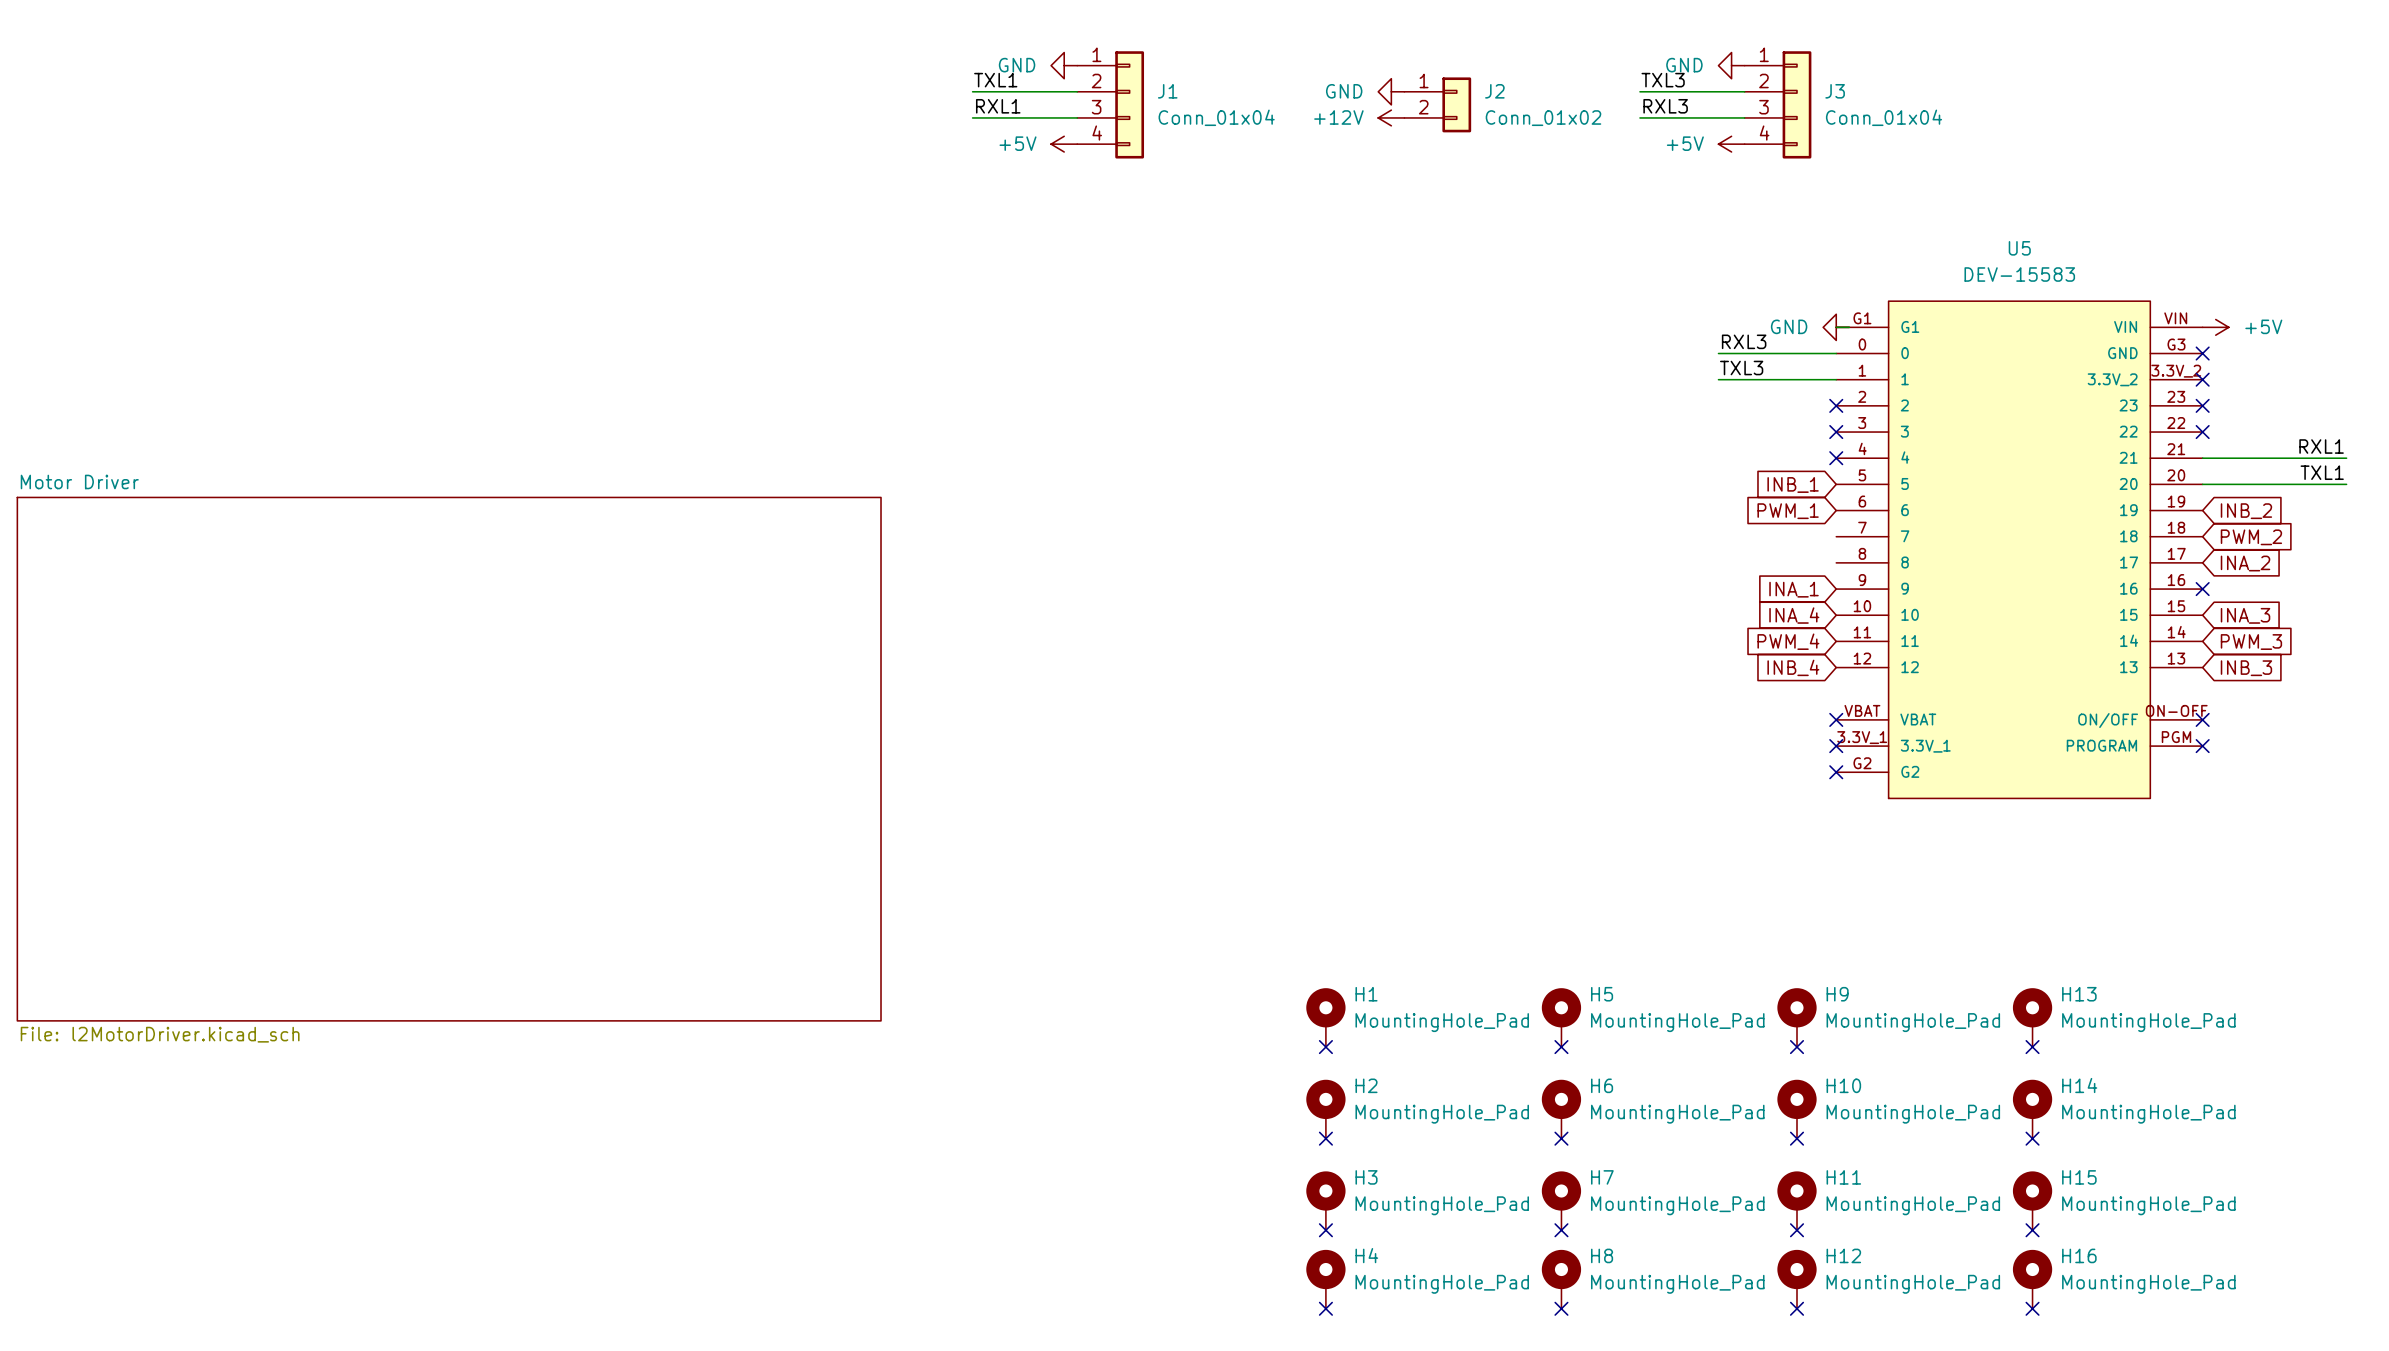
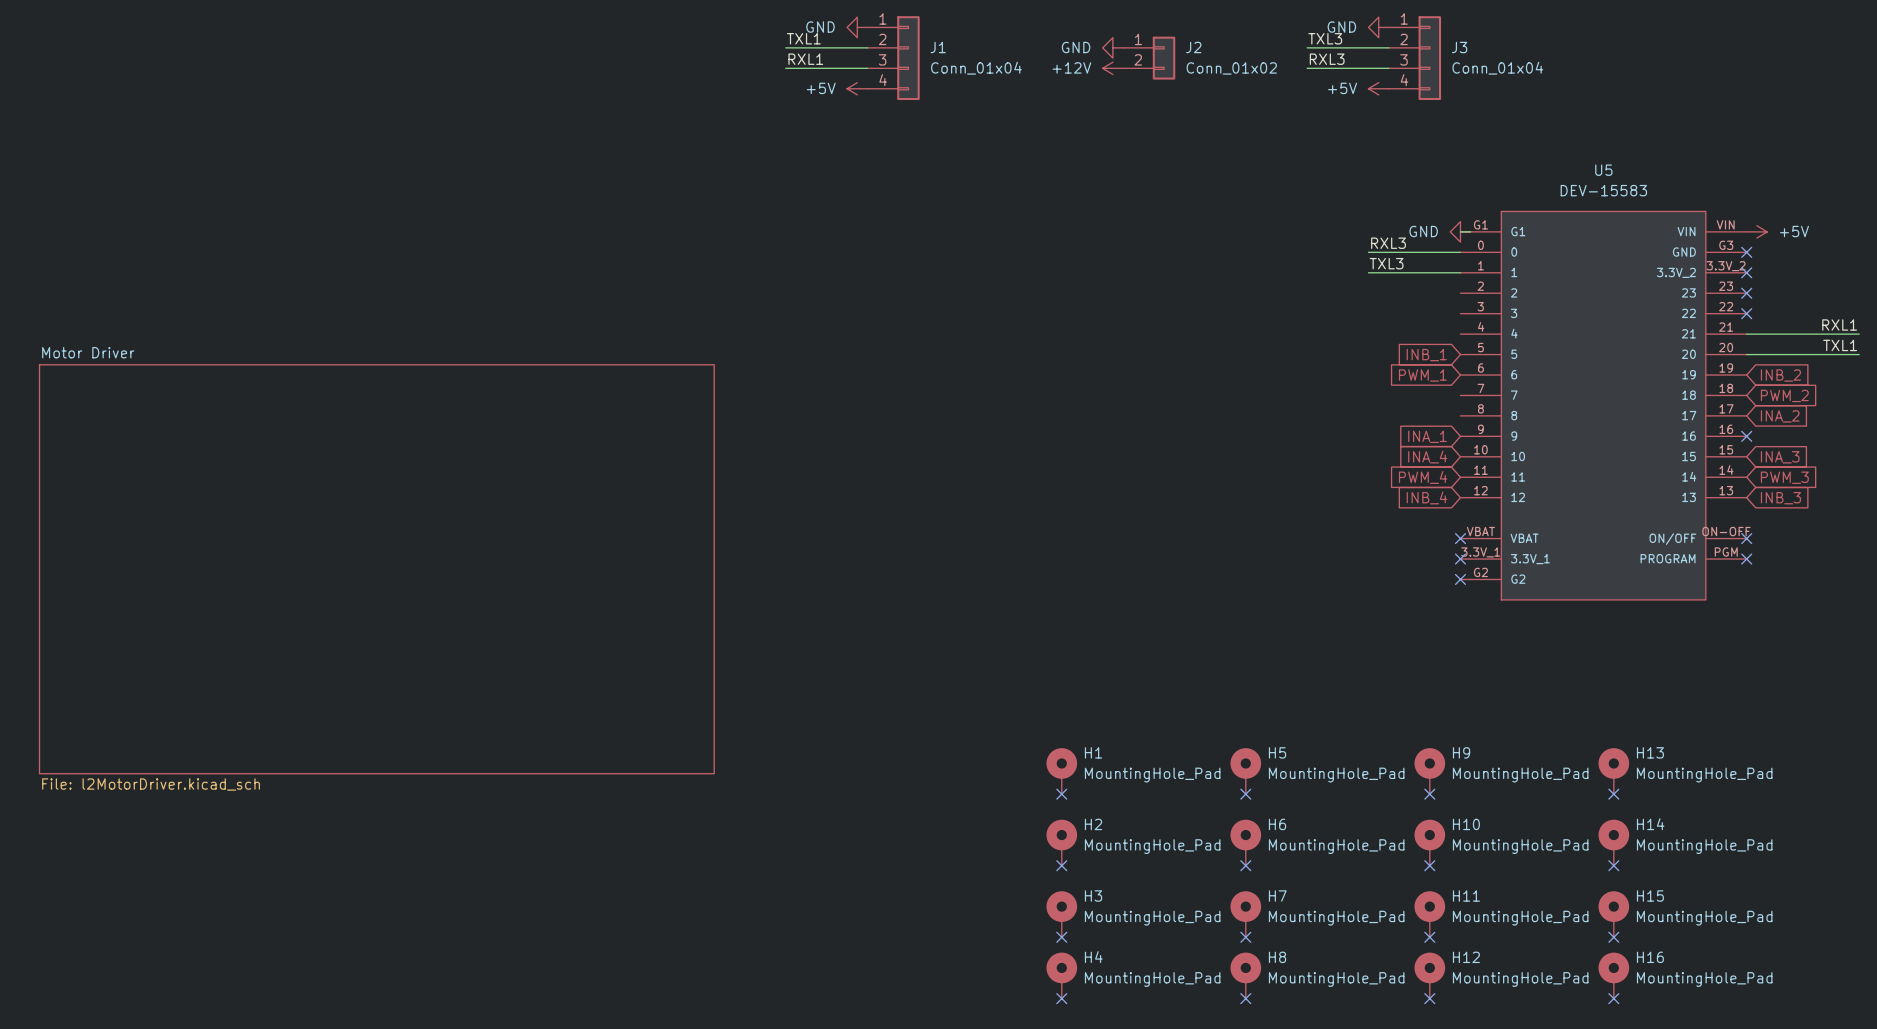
no-connect mark: (1836, 405) -> none
no-connect mark: (1836, 432) -> none
no-connect mark: (1836, 458) -> none

